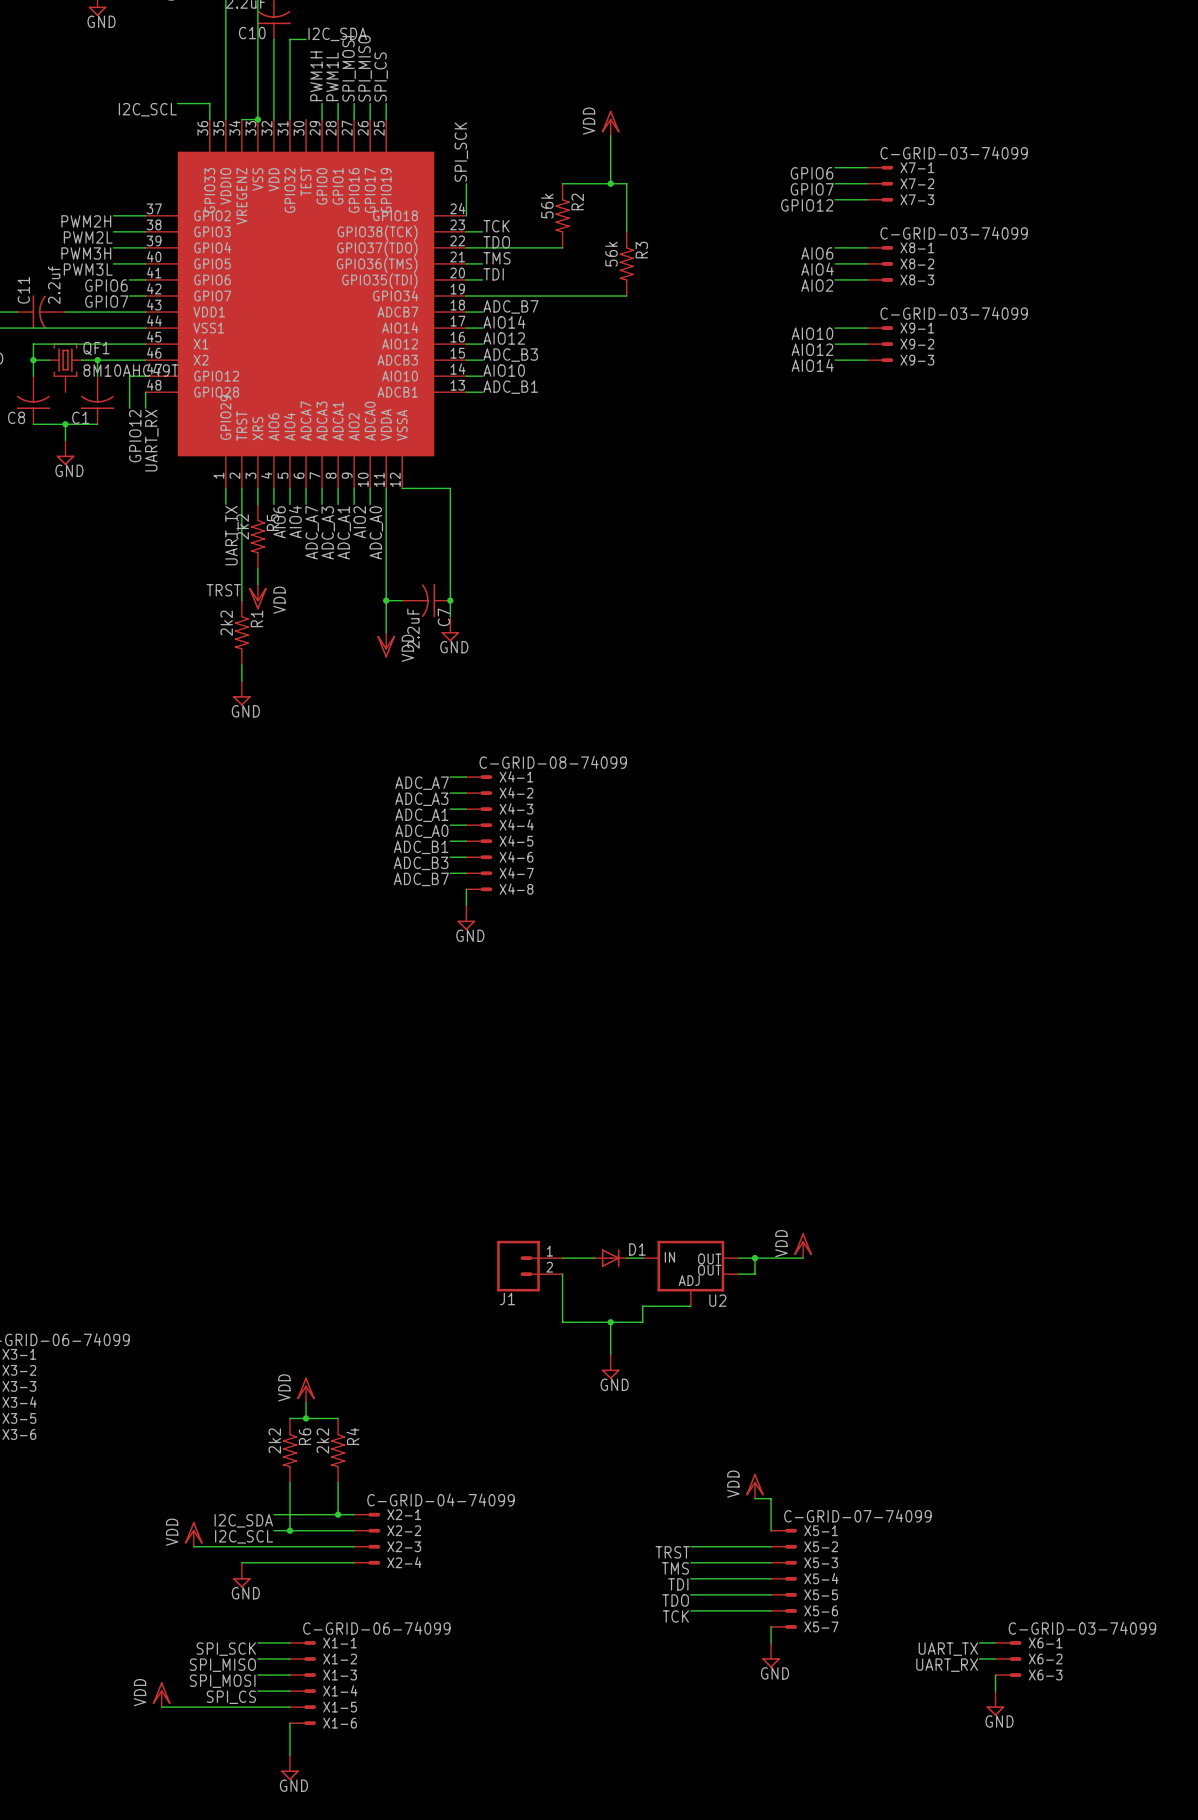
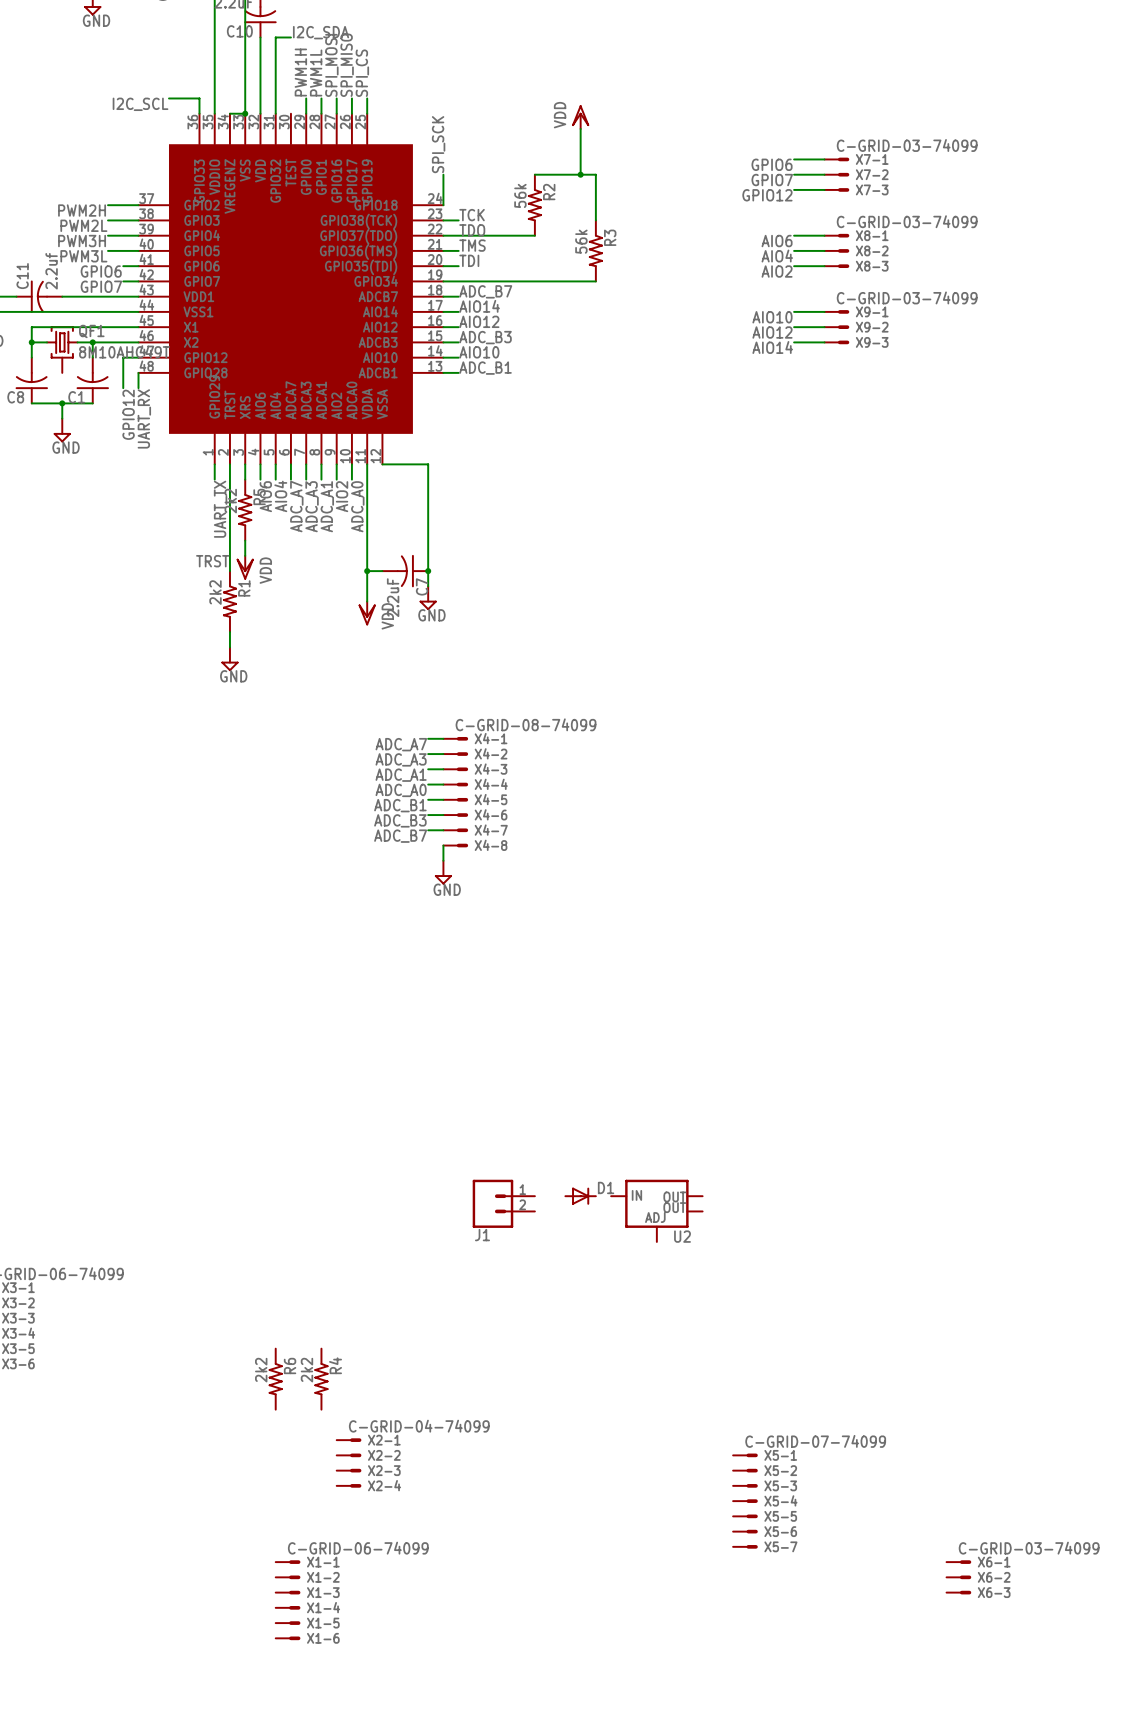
power symbol: VDD (803, 1245) -> none
wire: (562, 1258) (594, 1258) -> none
wire: (626, 1258) (642, 1258) -> none
wire: (738, 1258) (803, 1258) -> none
wire: (755, 1258) (755, 1274) (738, 1274) -> none
junction: (755, 1258) -> none
wire: (562, 1274) (562, 1322) (642, 1322) (642, 1306) (690, 1306) -> none
wire: (610, 1322) (610, 1354) -> none
junction: (610, 1322) -> none
power symbol: GND (610, 1366) -> none
power symbol: VDD (306, 1390) -> none
wire: (306, 1402) (306, 1418) -> none
wire: (289, 1418) (338, 1418) -> none
junction: (306, 1418) -> none
wire: (289, 1482) (289, 1530) -> none
wire: (338, 1482) (338, 1514) -> none
power symbol: VDD (755, 1486) -> none
wire: (755, 1498) (771, 1498) (771, 1530) -> none
wire: (273, 1514) (354, 1514) -> none
junction: (338, 1514) -> none
label: I2C_SDA (243, 1520) -> none
wire: (273, 1530) (354, 1530) -> none
junction: (289, 1530) -> none
power symbol: VDD (193, 1534) -> none
label: I2C_SCL (244, 1536) -> none
wire: (193, 1546) (354, 1546) -> none
wire: (690, 1546) (771, 1546) -> none
label: TRST (672, 1552) -> none
wire: (241, 1562) (354, 1562) -> none
wire: (690, 1562) (771, 1562) -> none
label: TMS (675, 1568) -> none
power symbol: GND (241, 1575) -> none
wire: (690, 1578) (771, 1578) -> none
label: TDI (678, 1584) -> none
wire: (690, 1594) (771, 1594) -> none
label: TDO (675, 1600) -> none
wire: (690, 1610) (771, 1610) -> none
label: TCK (675, 1616) -> none
wire: (771, 1626) (771, 1642) -> none
wire: (257, 1642) (289, 1642) -> none
wire: (979, 1642) (995, 1642) -> none
label: SPI_SCK (226, 1649) -> none
label: UART_TX (948, 1649) -> none
power symbol: GND (771, 1655) -> none
wire: (257, 1659) (289, 1659) -> none
wire: (979, 1659) (995, 1659) -> none
label: SPI_MISO (222, 1665) -> none
label: UART_RX (947, 1665) -> none
wire: (257, 1675) (289, 1675) -> none
wire: (995, 1675) (995, 1691) -> none
label: SPI_MOSI (222, 1681) -> none
wire: (257, 1691) (289, 1691) -> none
power symbol: VDD (161, 1694) -> none
label: SPI_CS (231, 1697) -> none
power symbol: GND (995, 1703) -> none
wire: (161, 1707) (289, 1707) -> none
wire: (289, 1723) (289, 1755) -> none
power symbol: GND (289, 1767) -> none

